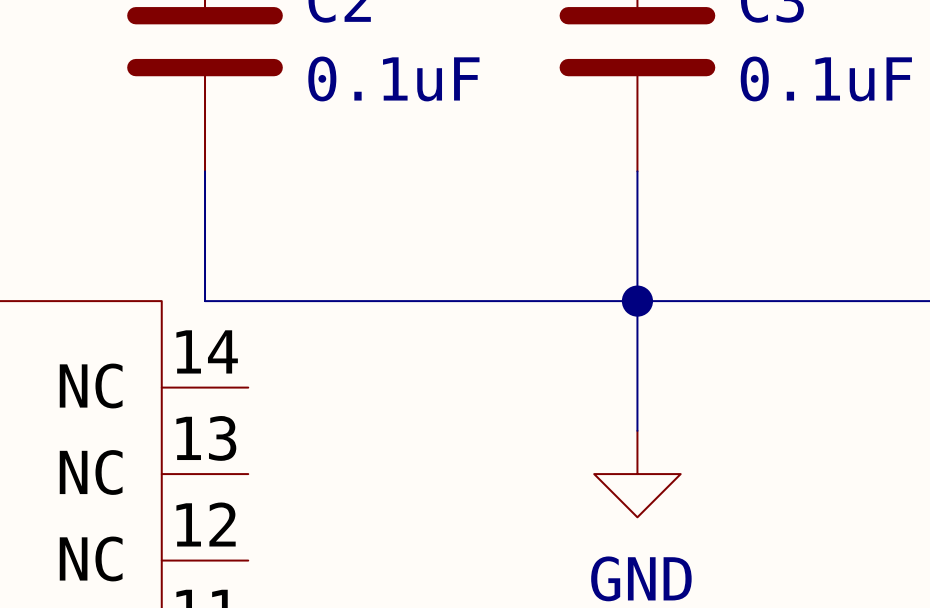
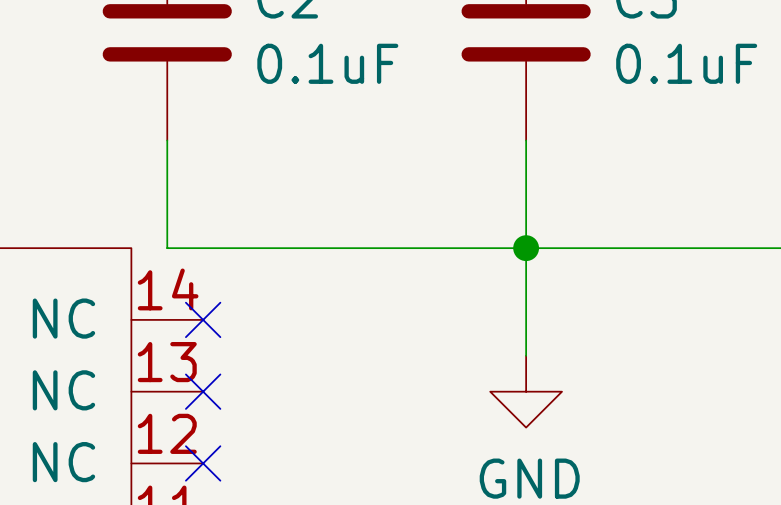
no-connect mark: none -> (203, 319)
no-connect mark: none -> (203, 391)
no-connect mark: none -> (203, 463)

